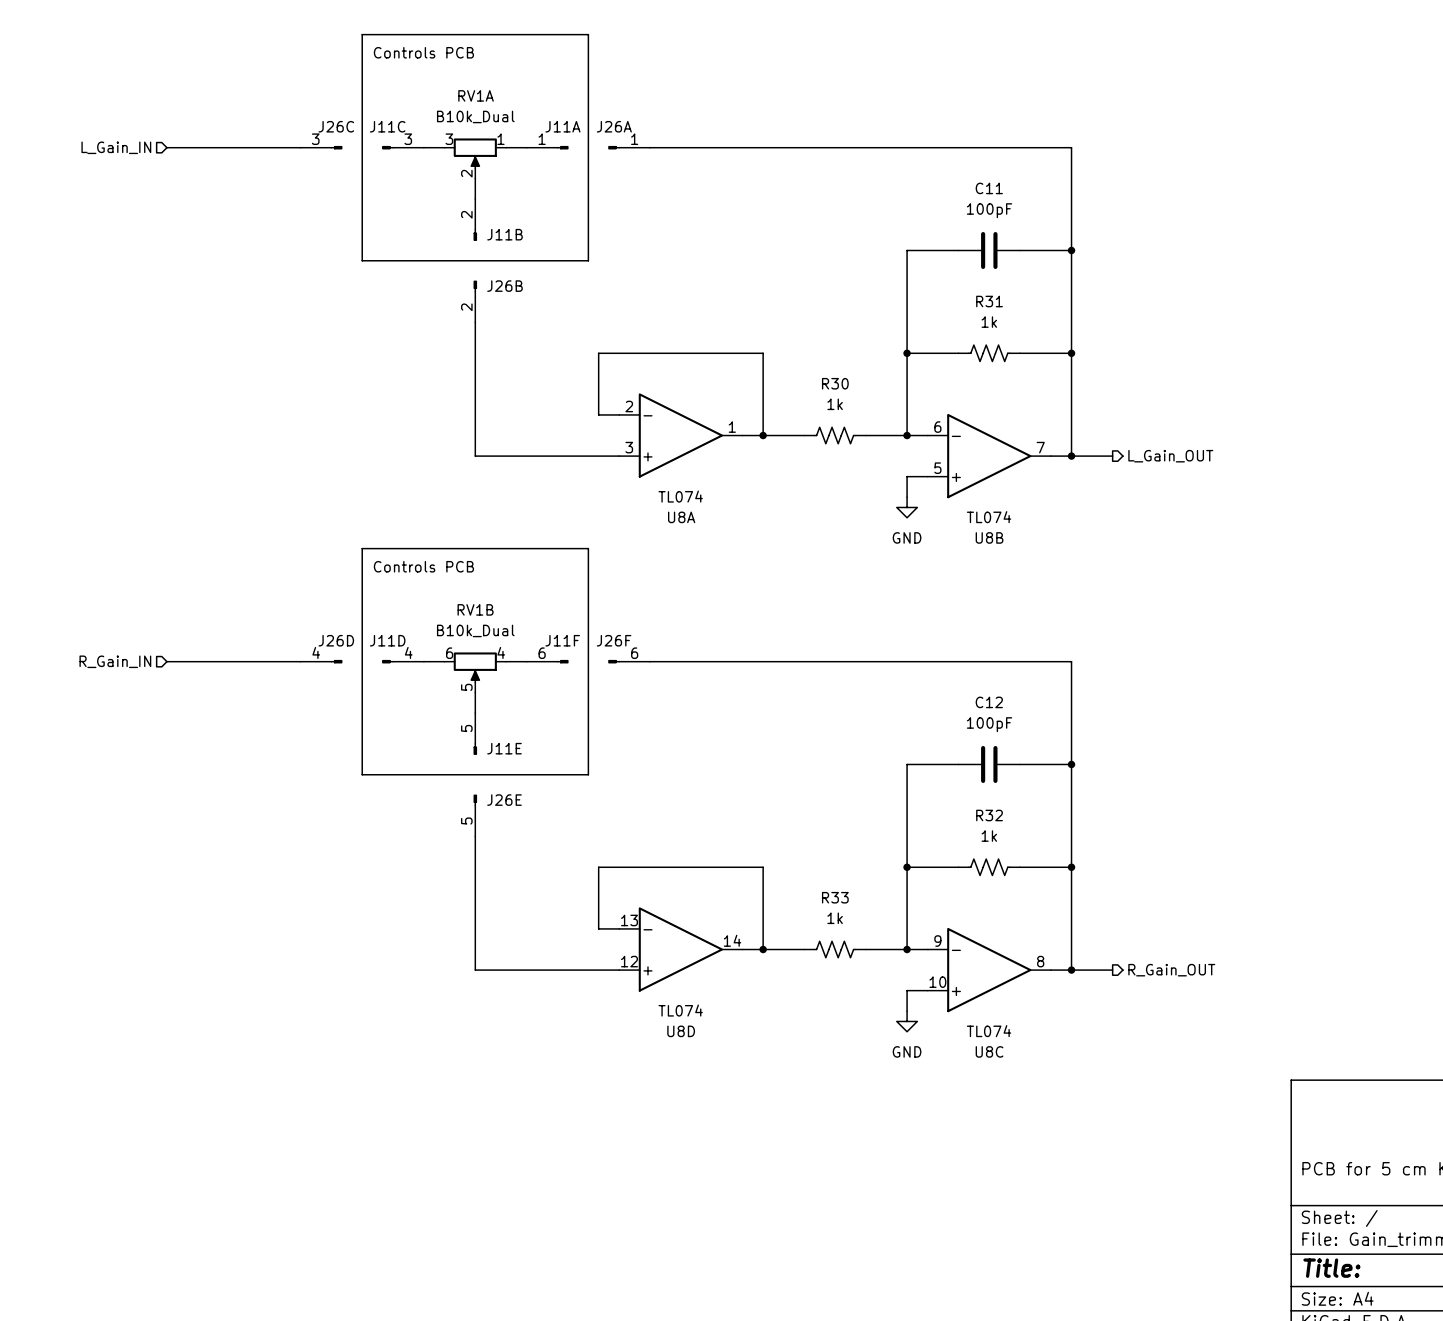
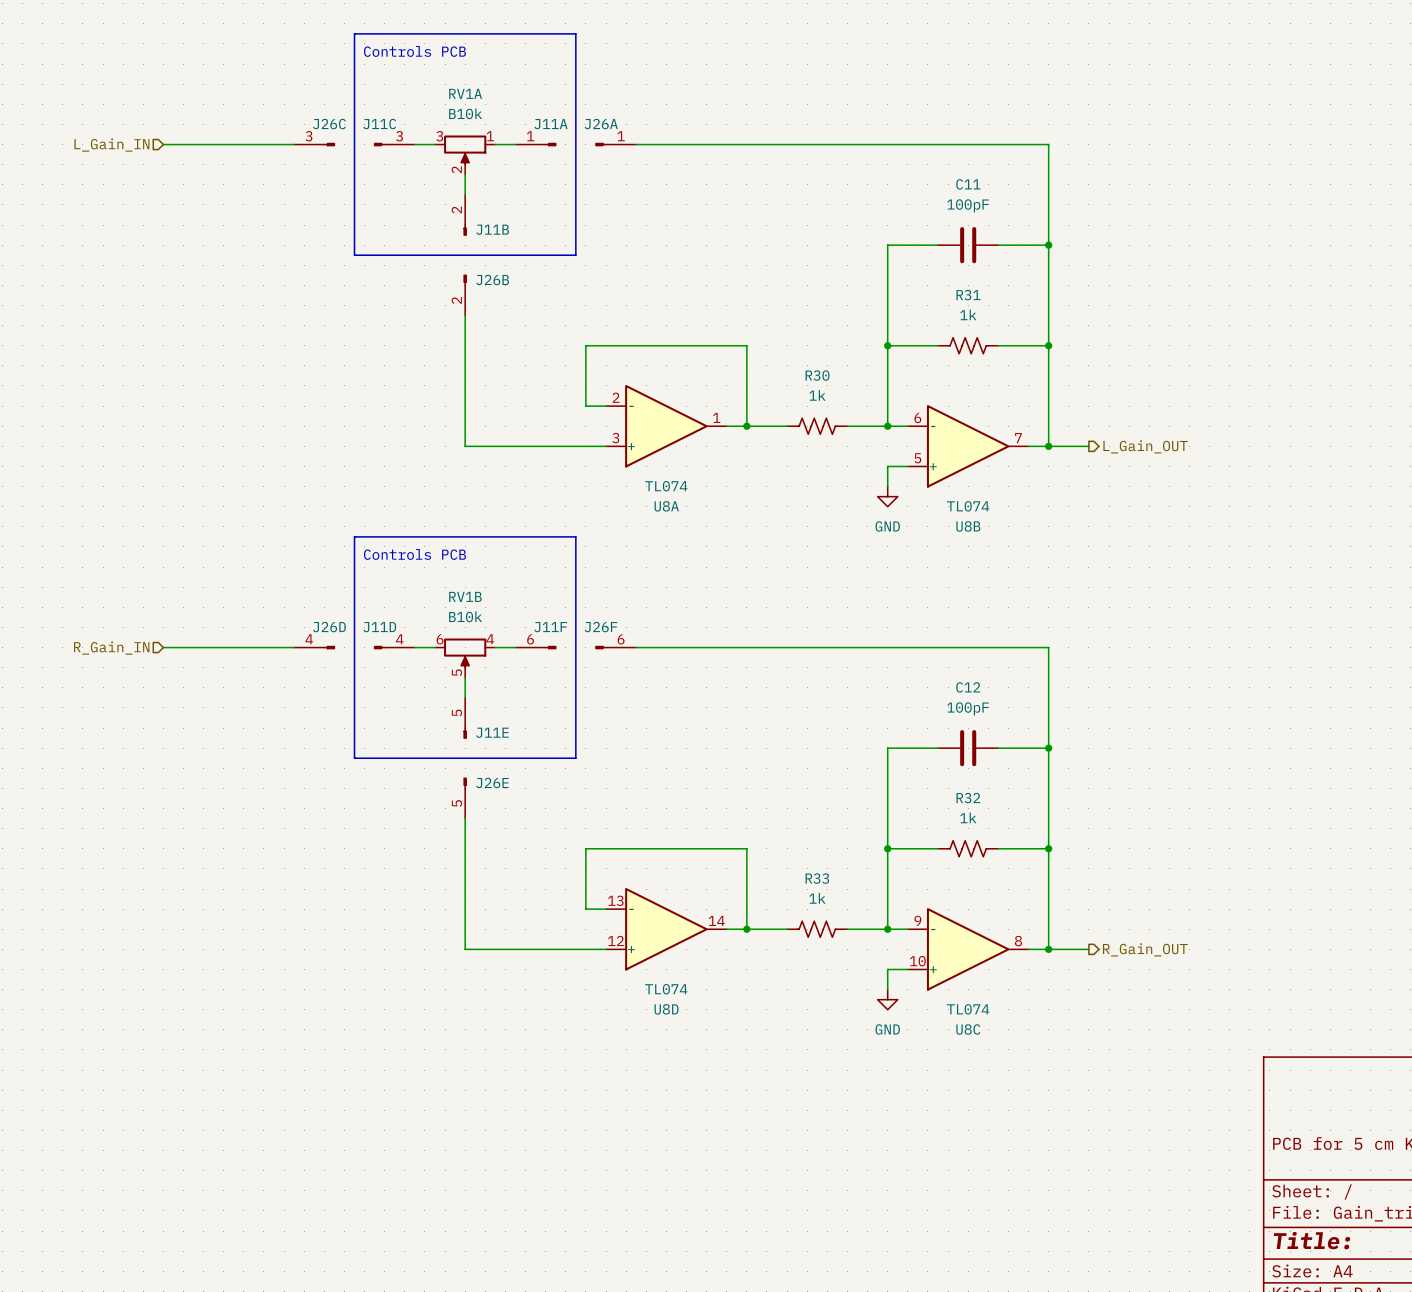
RV1A value: B10k_Dual (475, 116) -> B10k (465, 113)
RV1B value: B10k_Dual (475, 630) -> B10k (465, 616)

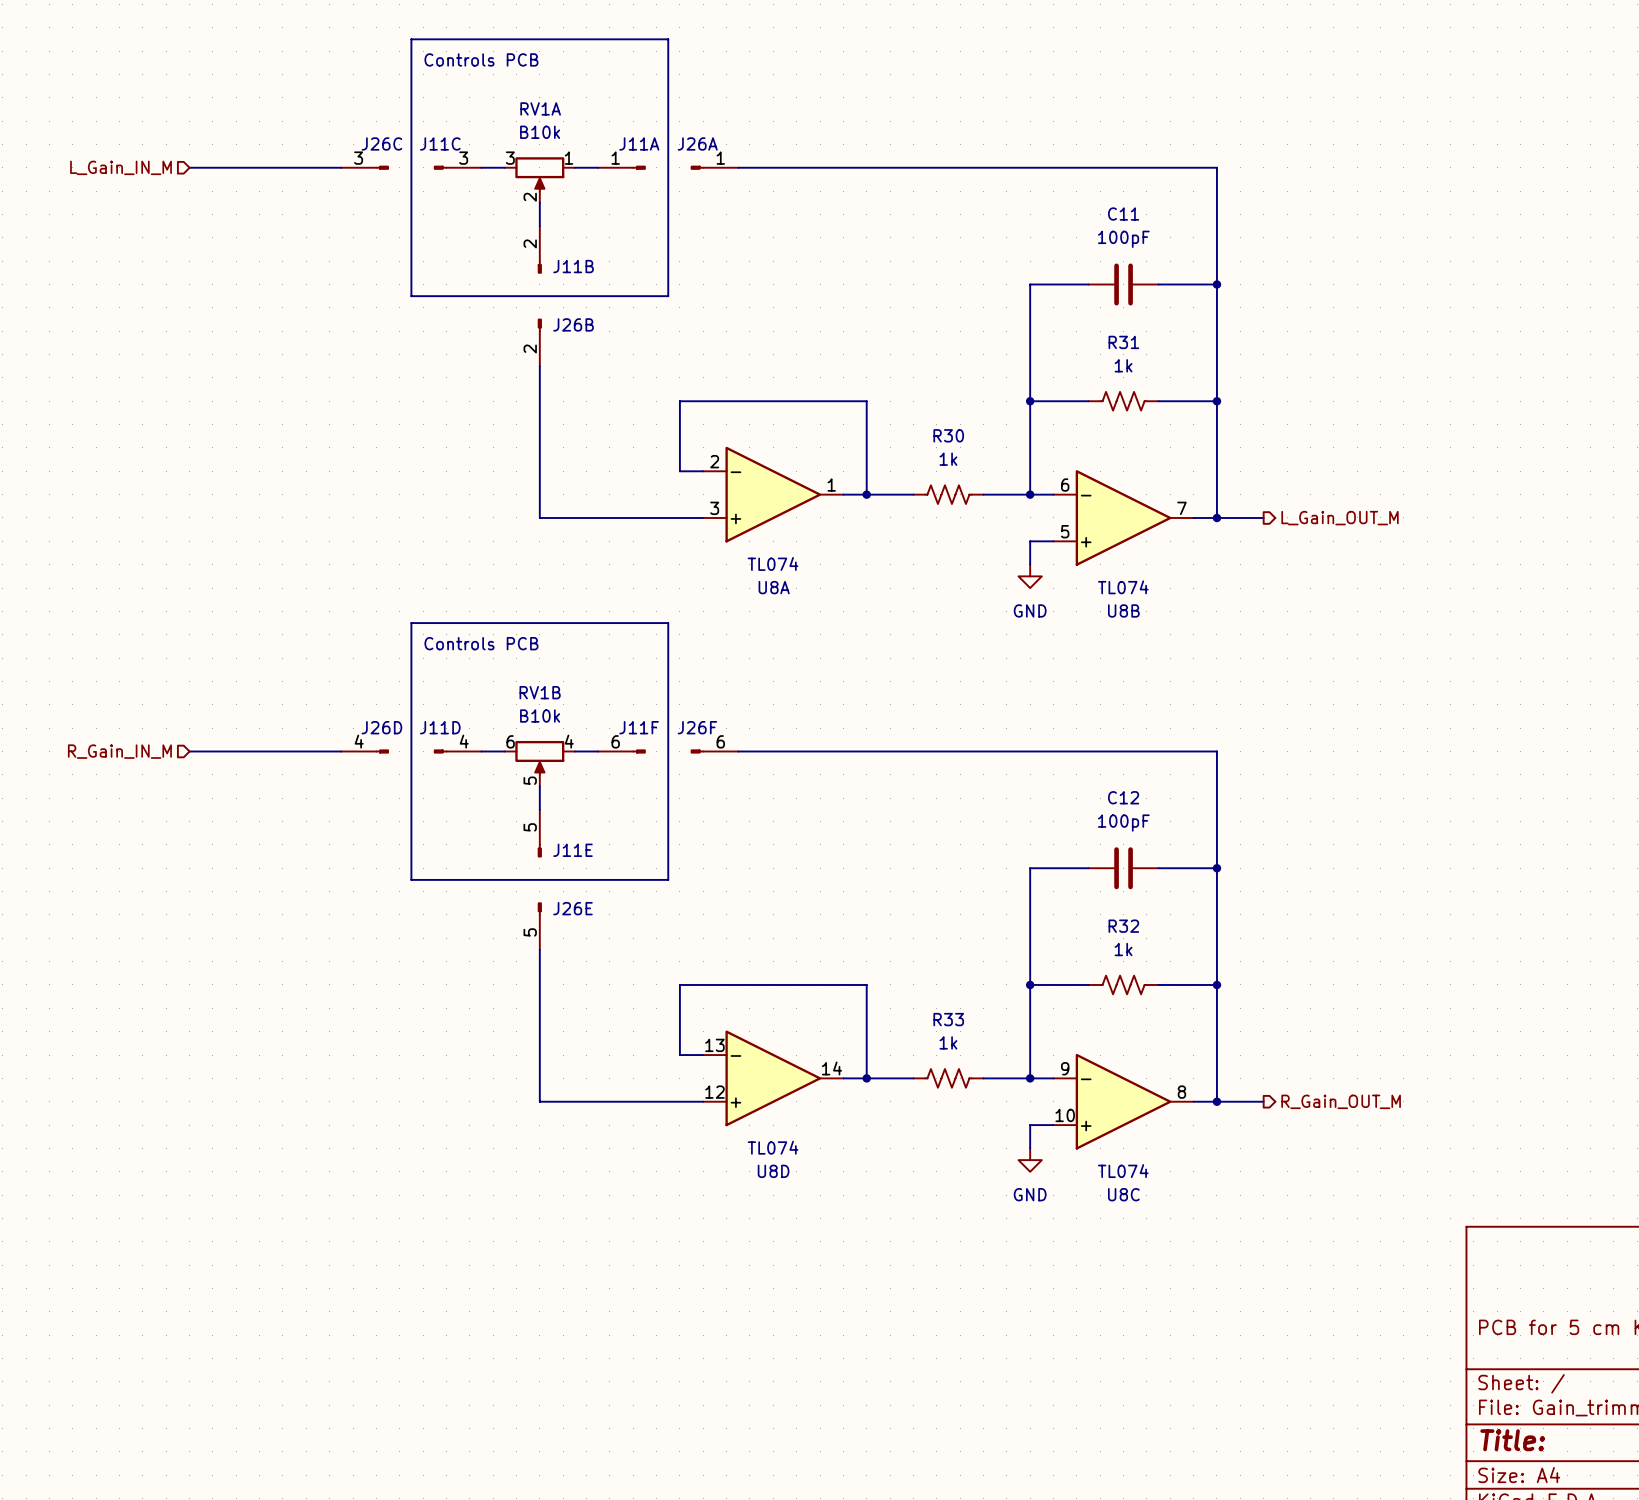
hierarchical label: L_Gain_IN (111, 145) -> L_Gain_IN_M (121, 167)
hierarchical label: L_Gain_OUT (1145, 446) -> L_Gain_OUT_M (1340, 518)
hierarchical label: R_Gain_IN (111, 648) -> R_Gain_IN_M (119, 751)
hierarchical label: R_Gain_OUT (1145, 949) -> R_Gain_OUT_M (1341, 1101)

